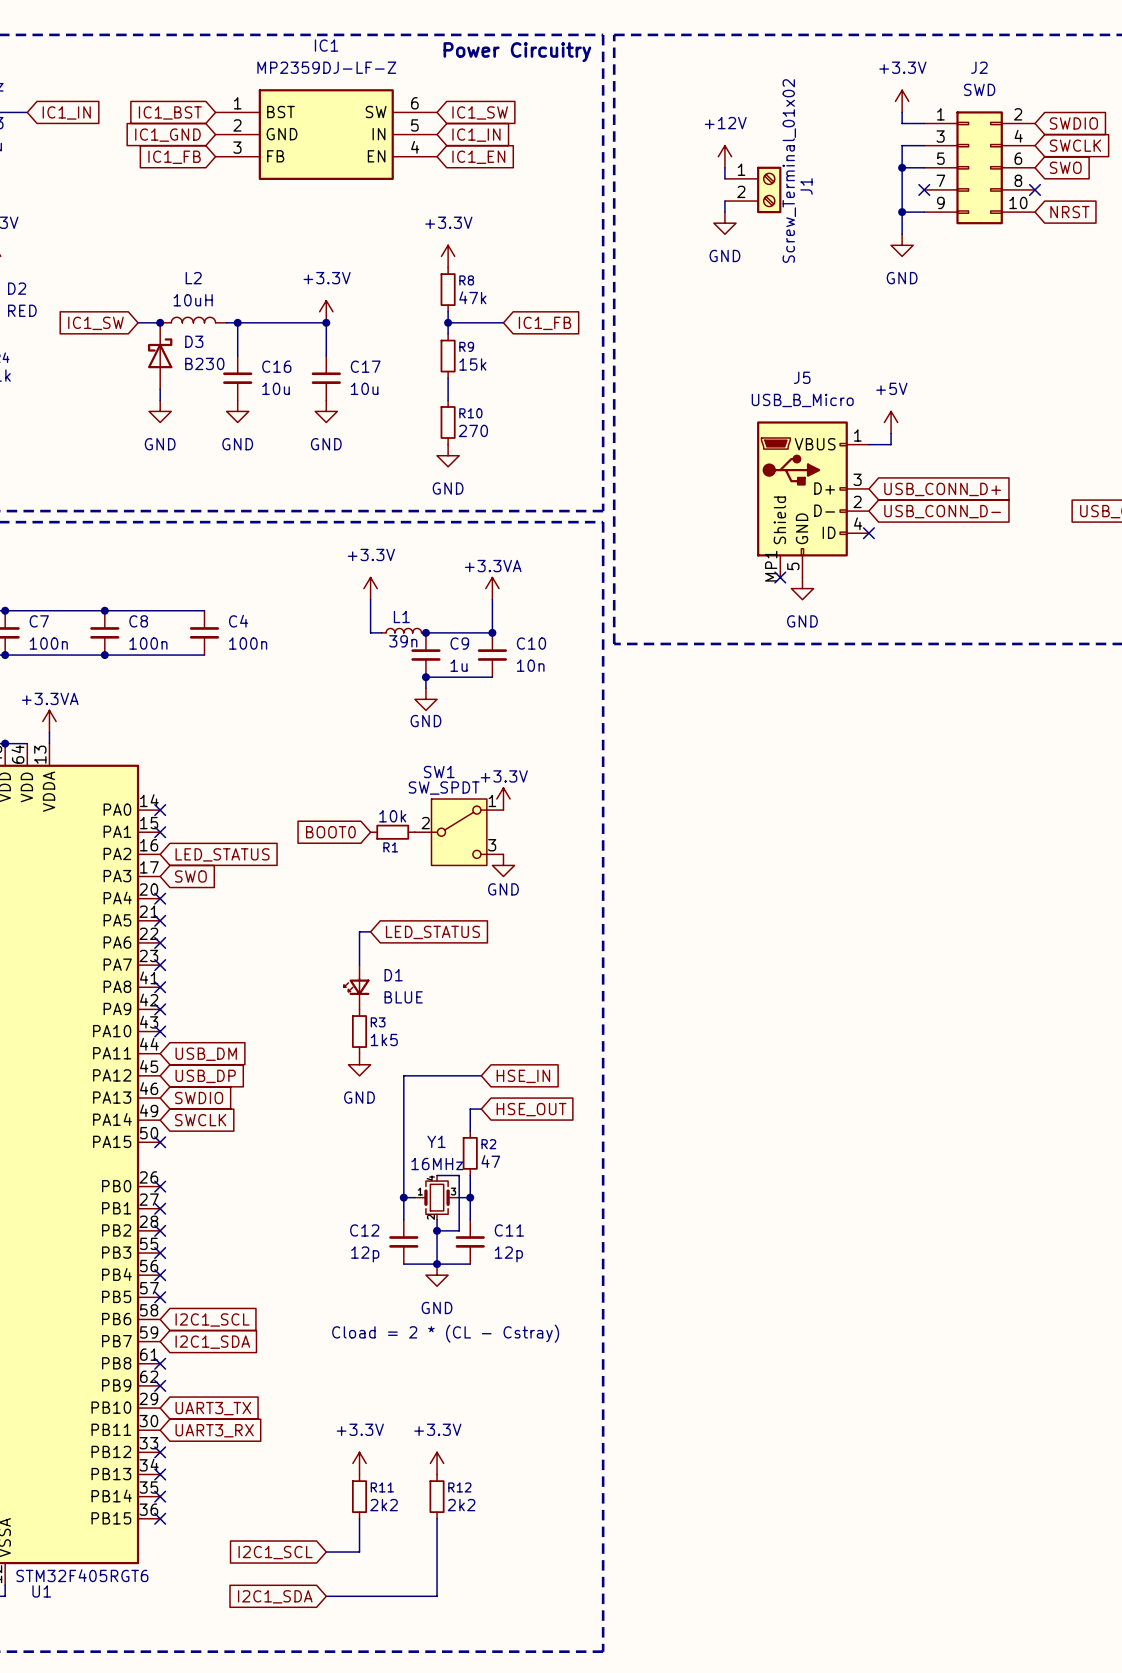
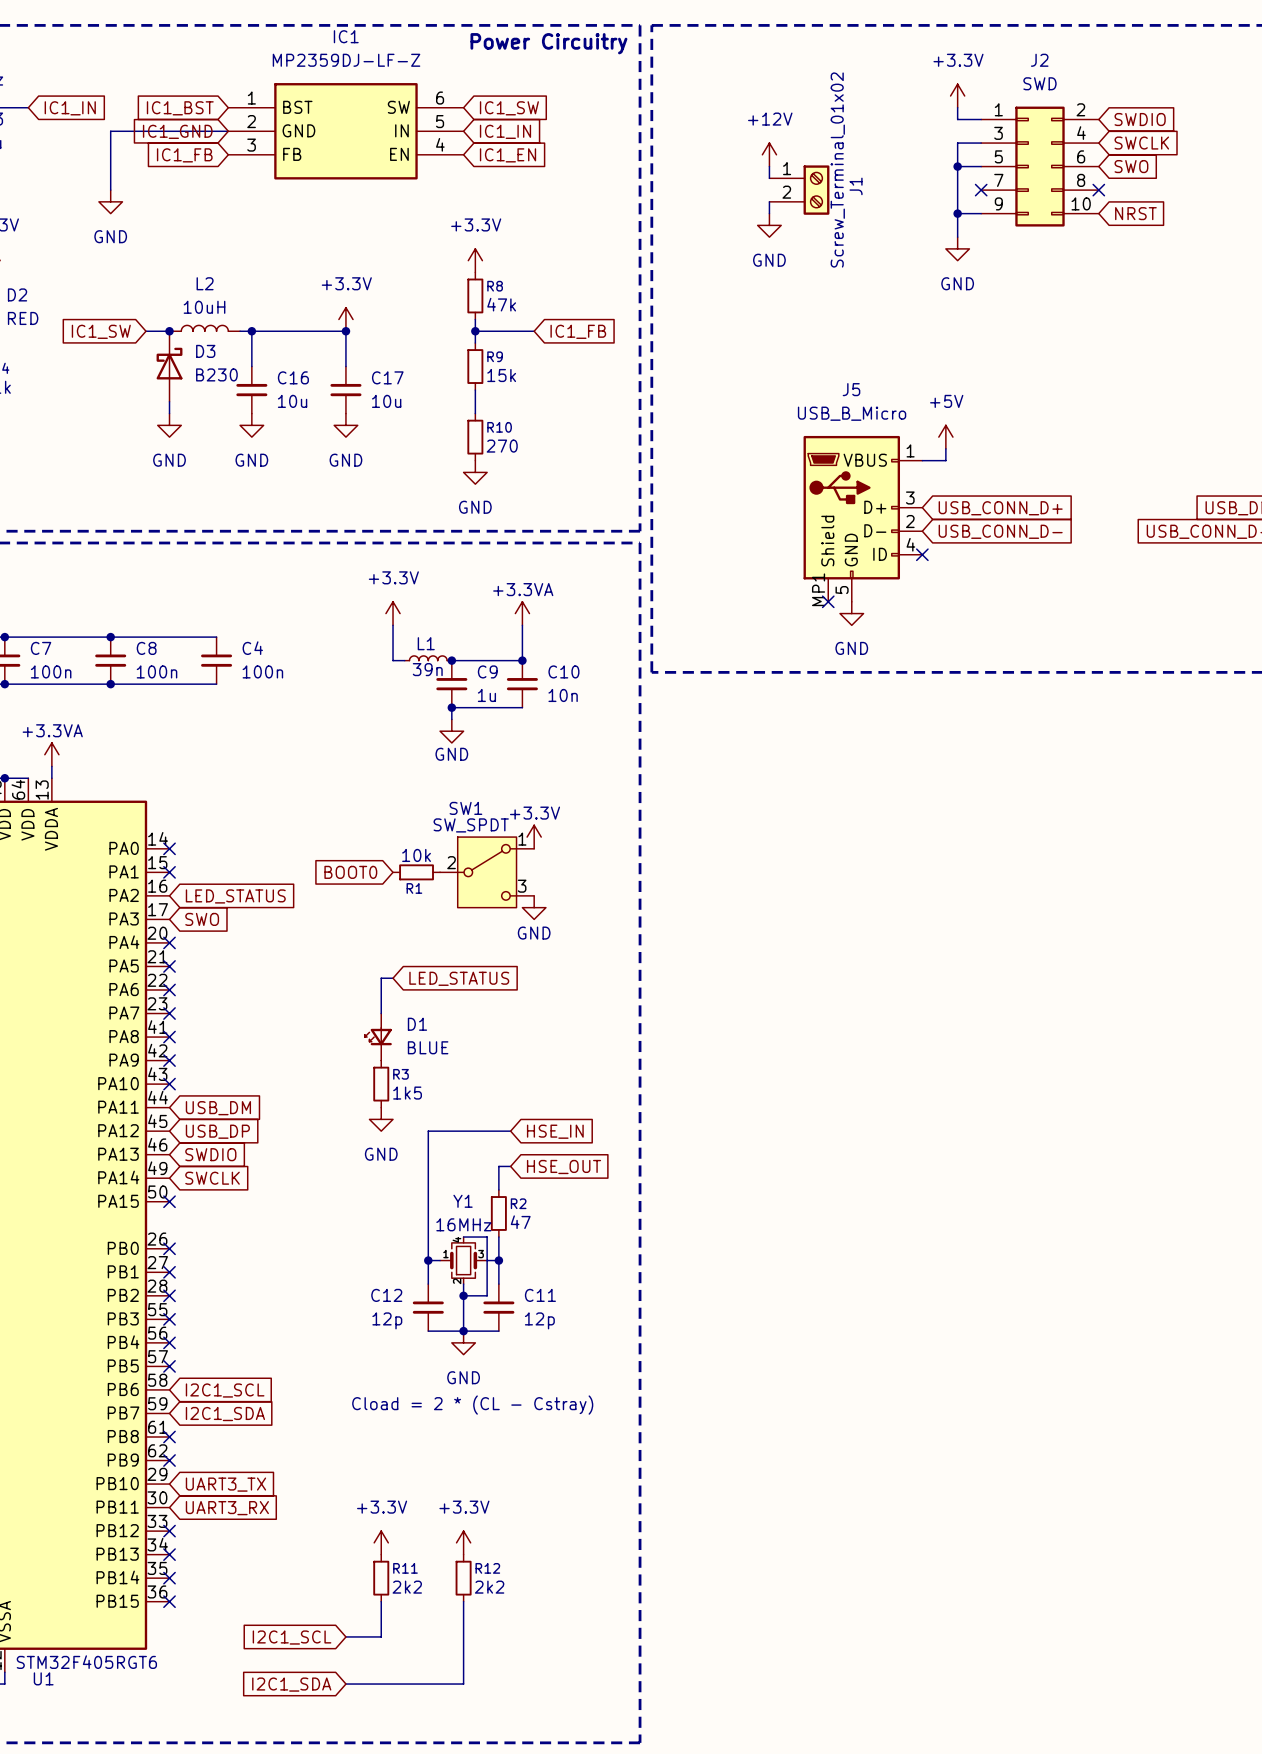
wire: none -> (228, 131) (110, 131) (110, 190)
power symbol: none -> GND (110, 201)

